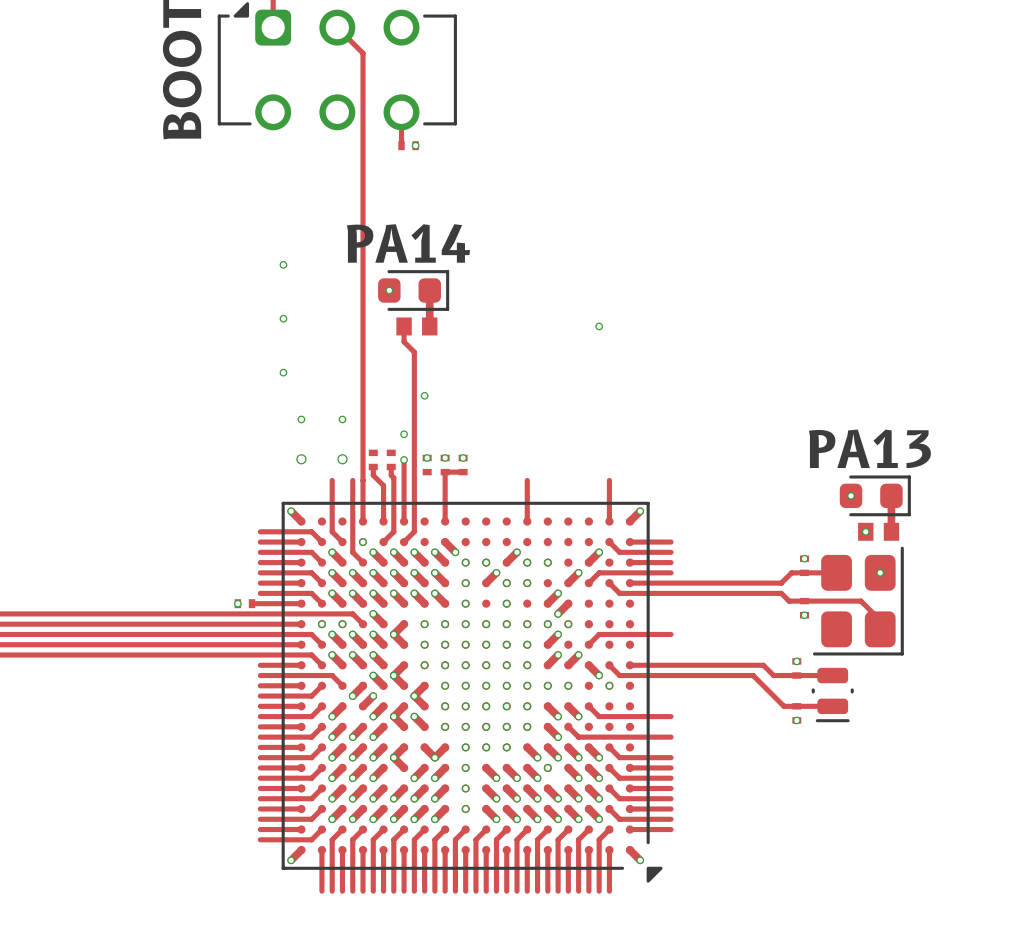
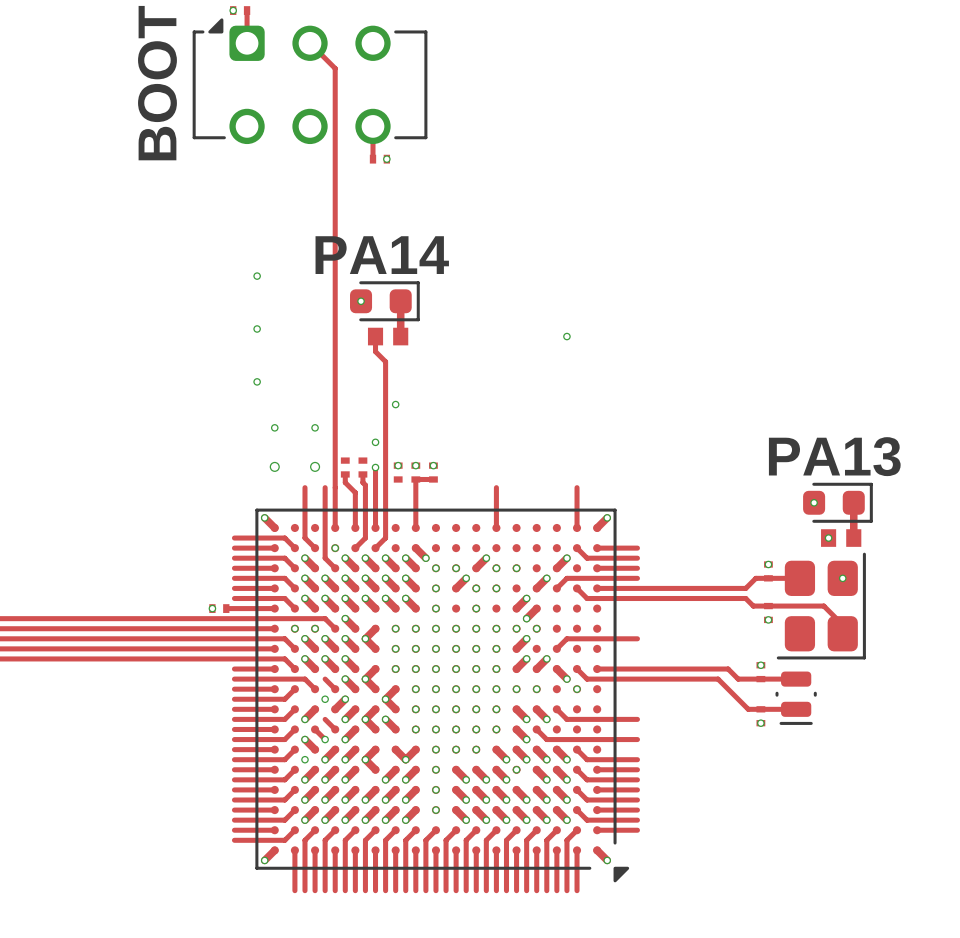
track: (363, 685) (352, 696) -> (335, 689) (325, 679)
track: (342, 726) (332, 737) -> (315, 729) (325, 739)
track: (363, 726) (352, 737) -> (335, 729) (325, 719)
track: (342, 747) (332, 757) -> (315, 749) (304, 739)

